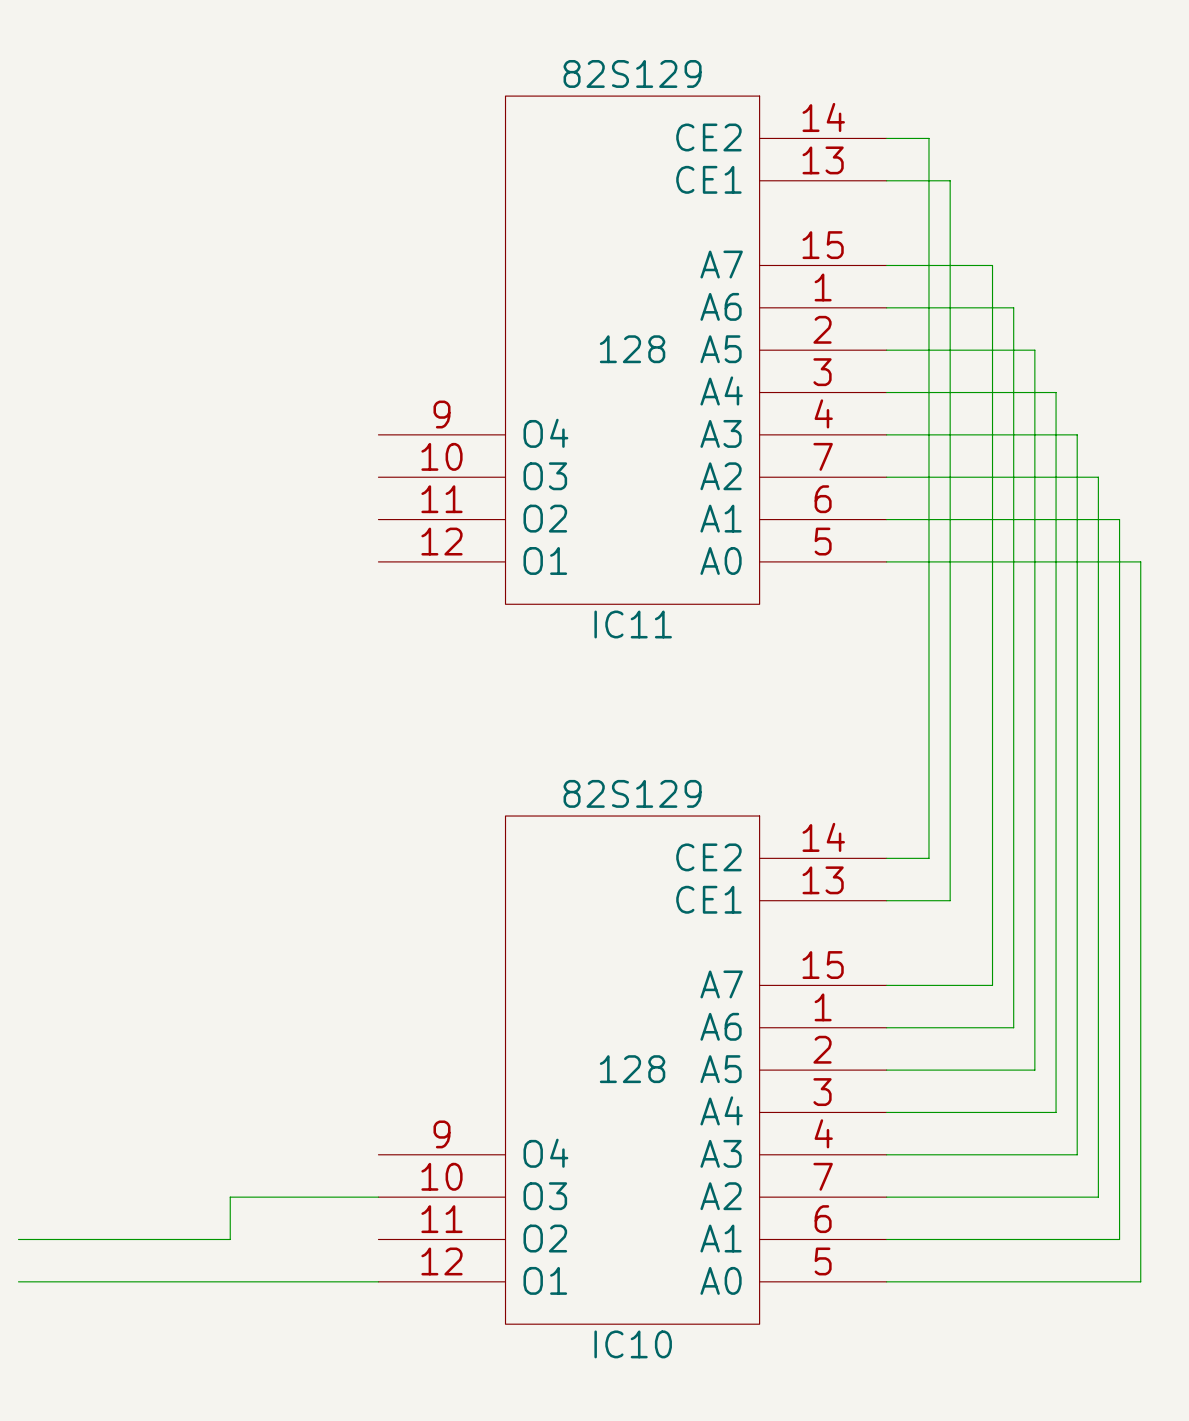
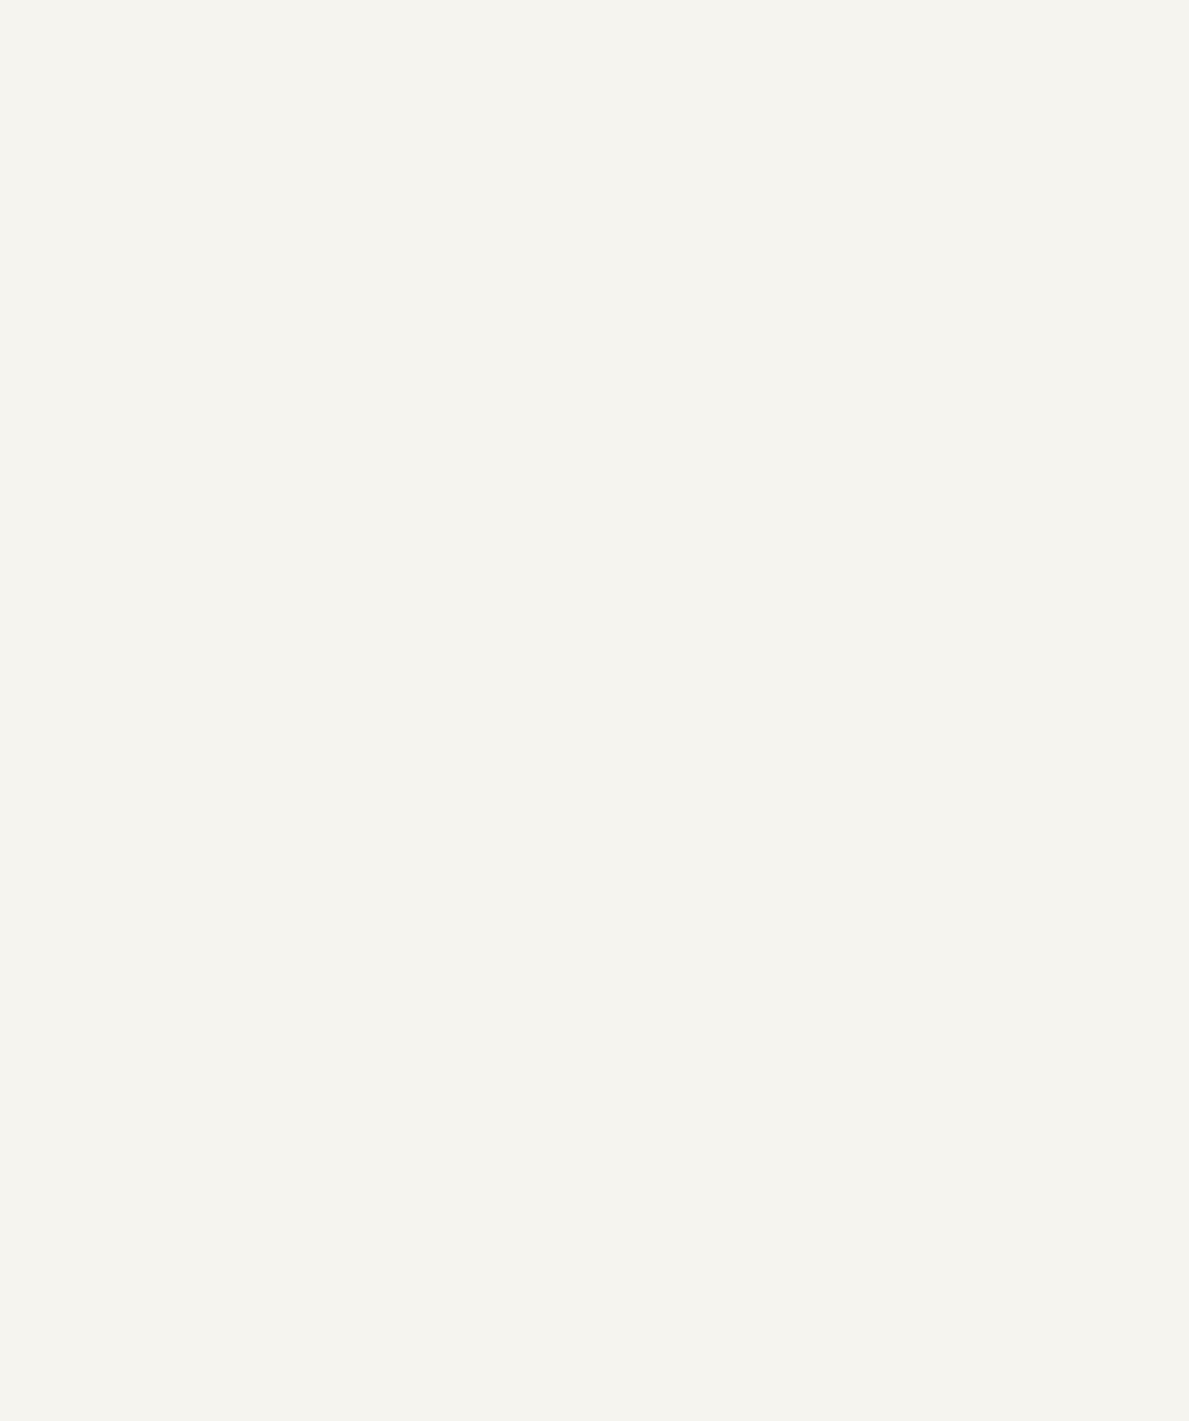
wire: (886, 138) (928, 138) (928, 858) (886, 858) -> none
wire: (886, 180) (950, 180) (950, 900) (886, 900) -> none
wire: (886, 265) (992, 265) (992, 985) (886, 985) -> none
wire: (886, 307) (1013, 307) (1013, 1027) (886, 1027) -> none
IC11: 82S129 (632, 350) -> none
wire: (886, 350) (1034, 350) (1034, 1070) (886, 1070) -> none
wire: (886, 392) (1056, 392) (1056, 1112) (886, 1112) -> none
wire: (886, 434) (1077, 434) (1077, 1154) (886, 1154) -> none
wire: (886, 477) (1098, 477) (1098, 1197) (886, 1197) -> none
wire: (886, 519) (1119, 519) (1119, 1239) (886, 1239) -> none
wire: (886, 561) (1140, 561) (1140, 1281) (886, 1281) -> none
IC10: 82S129 (632, 1070) -> none
wire: (378, 1197) (230, 1197) (230, 1239) (18, 1239) -> none
wire: (18, 1281) (378, 1281) -> none

